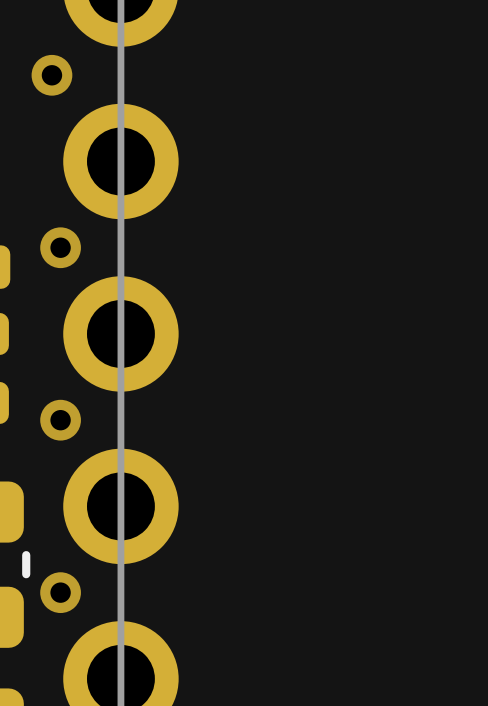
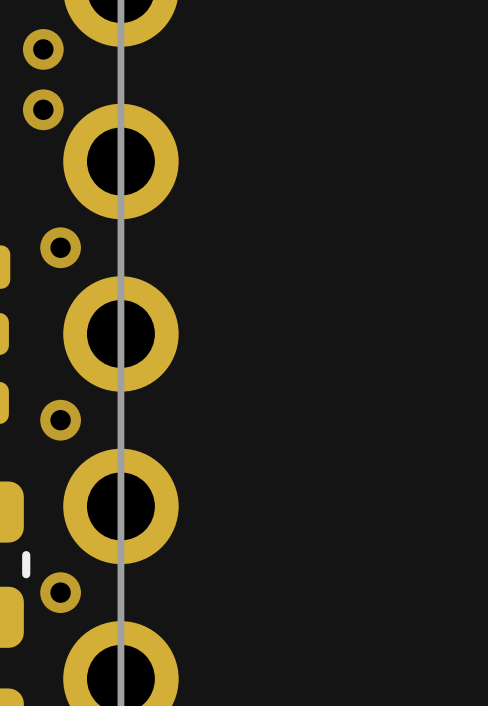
via: none -> (43, 49)
via: (51, 75) -> none
via: none -> (43, 109)

